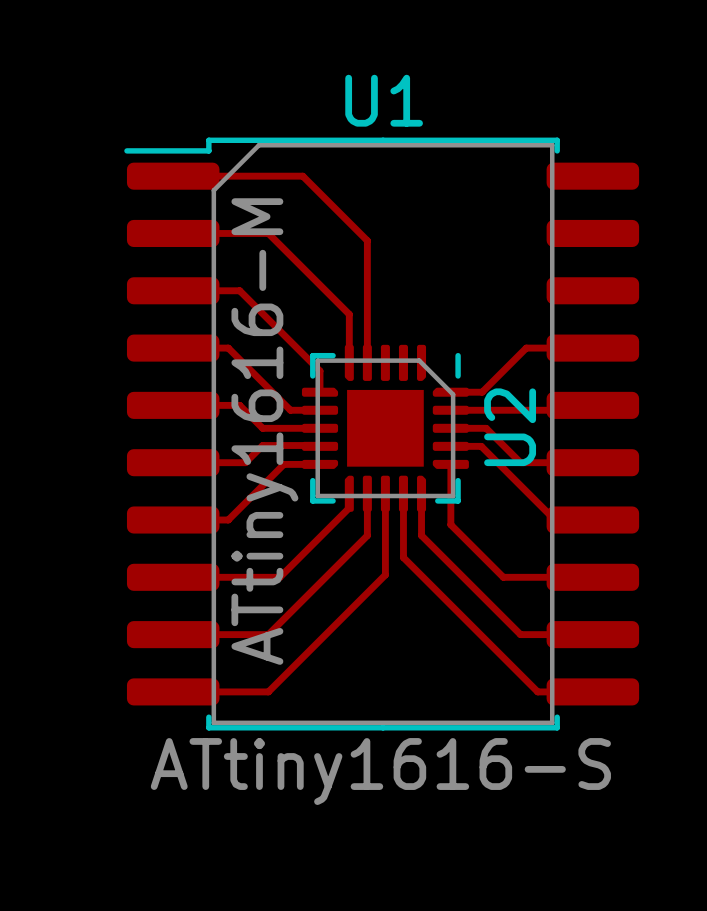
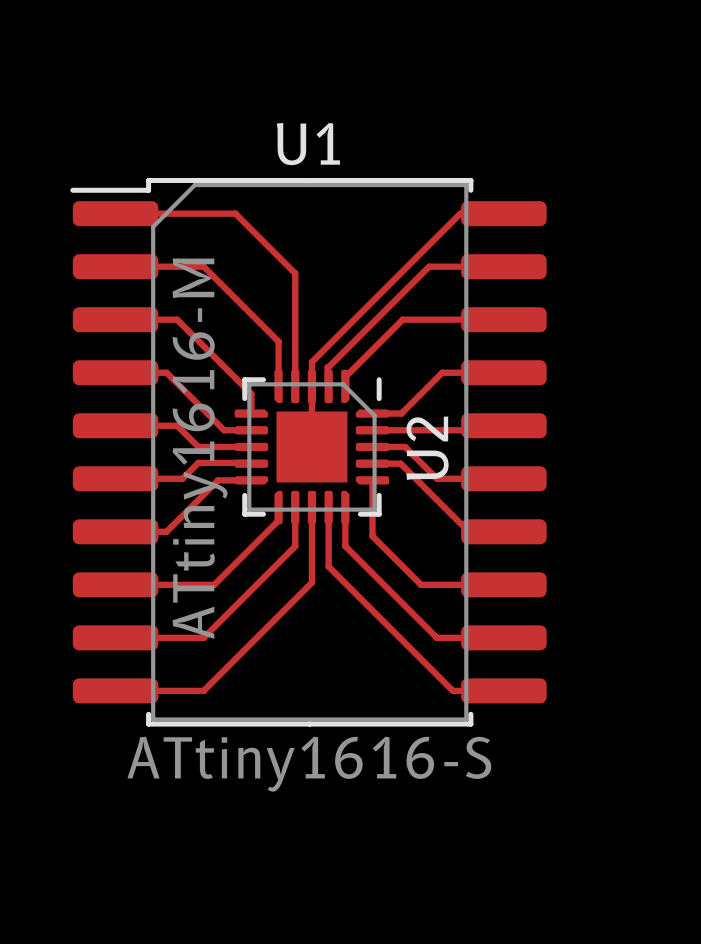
top track: none -> (503, 213) (460, 213) (311, 362) (311, 446)
top track: none -> (503, 266) (429, 266) (327, 367) (328, 386)
top track: none -> (503, 319) (402, 319) (345, 377) (345, 386)

